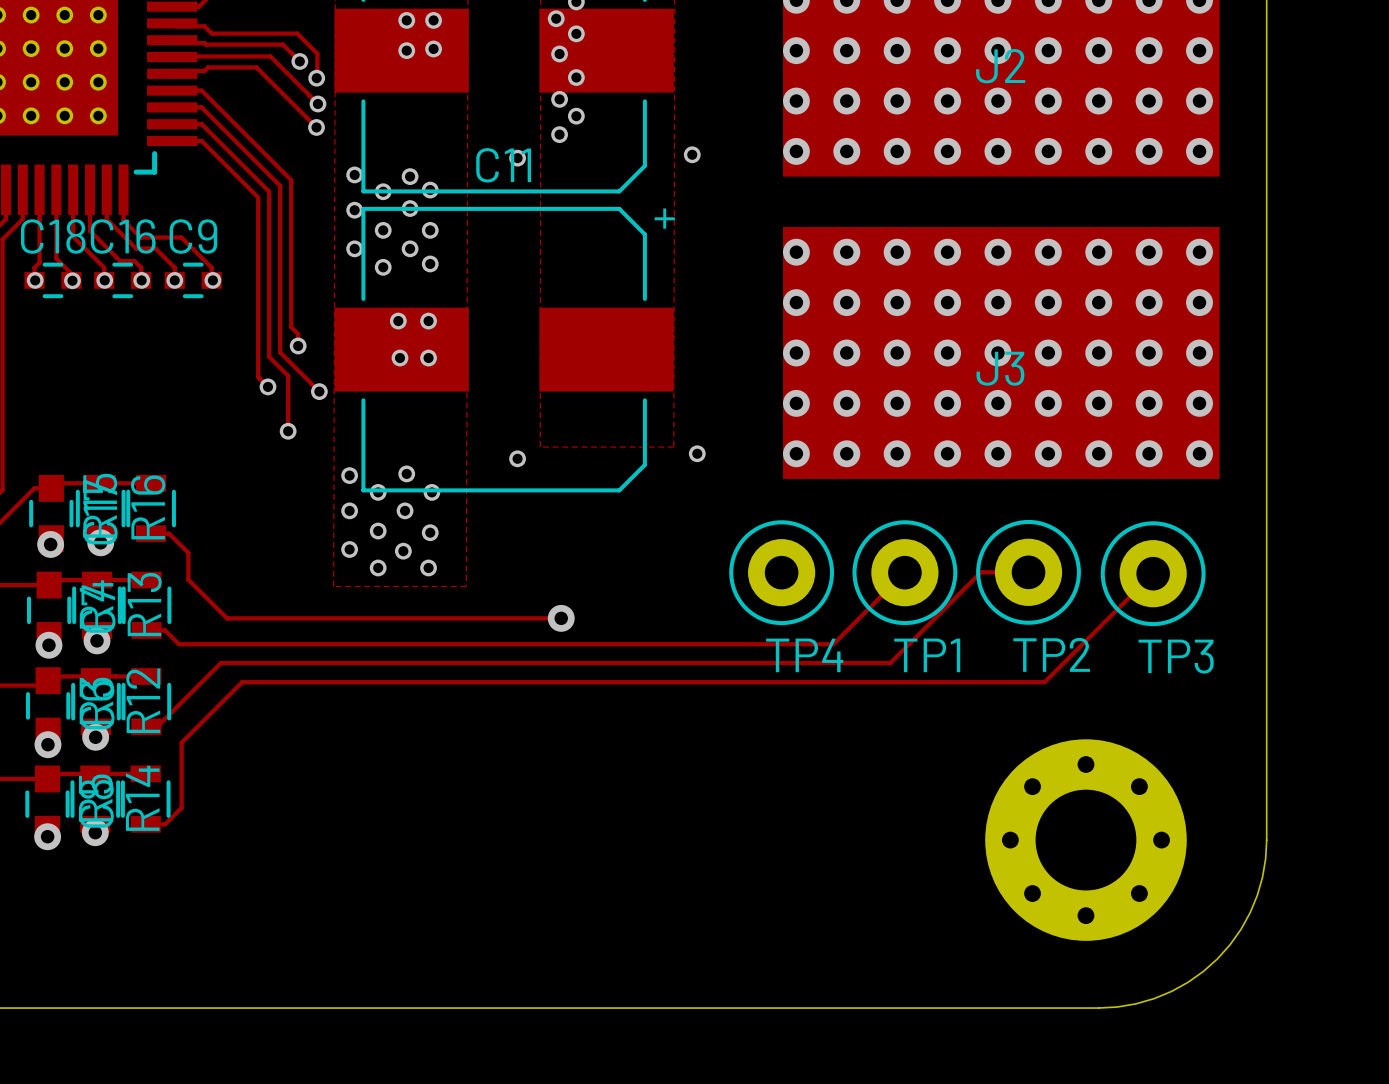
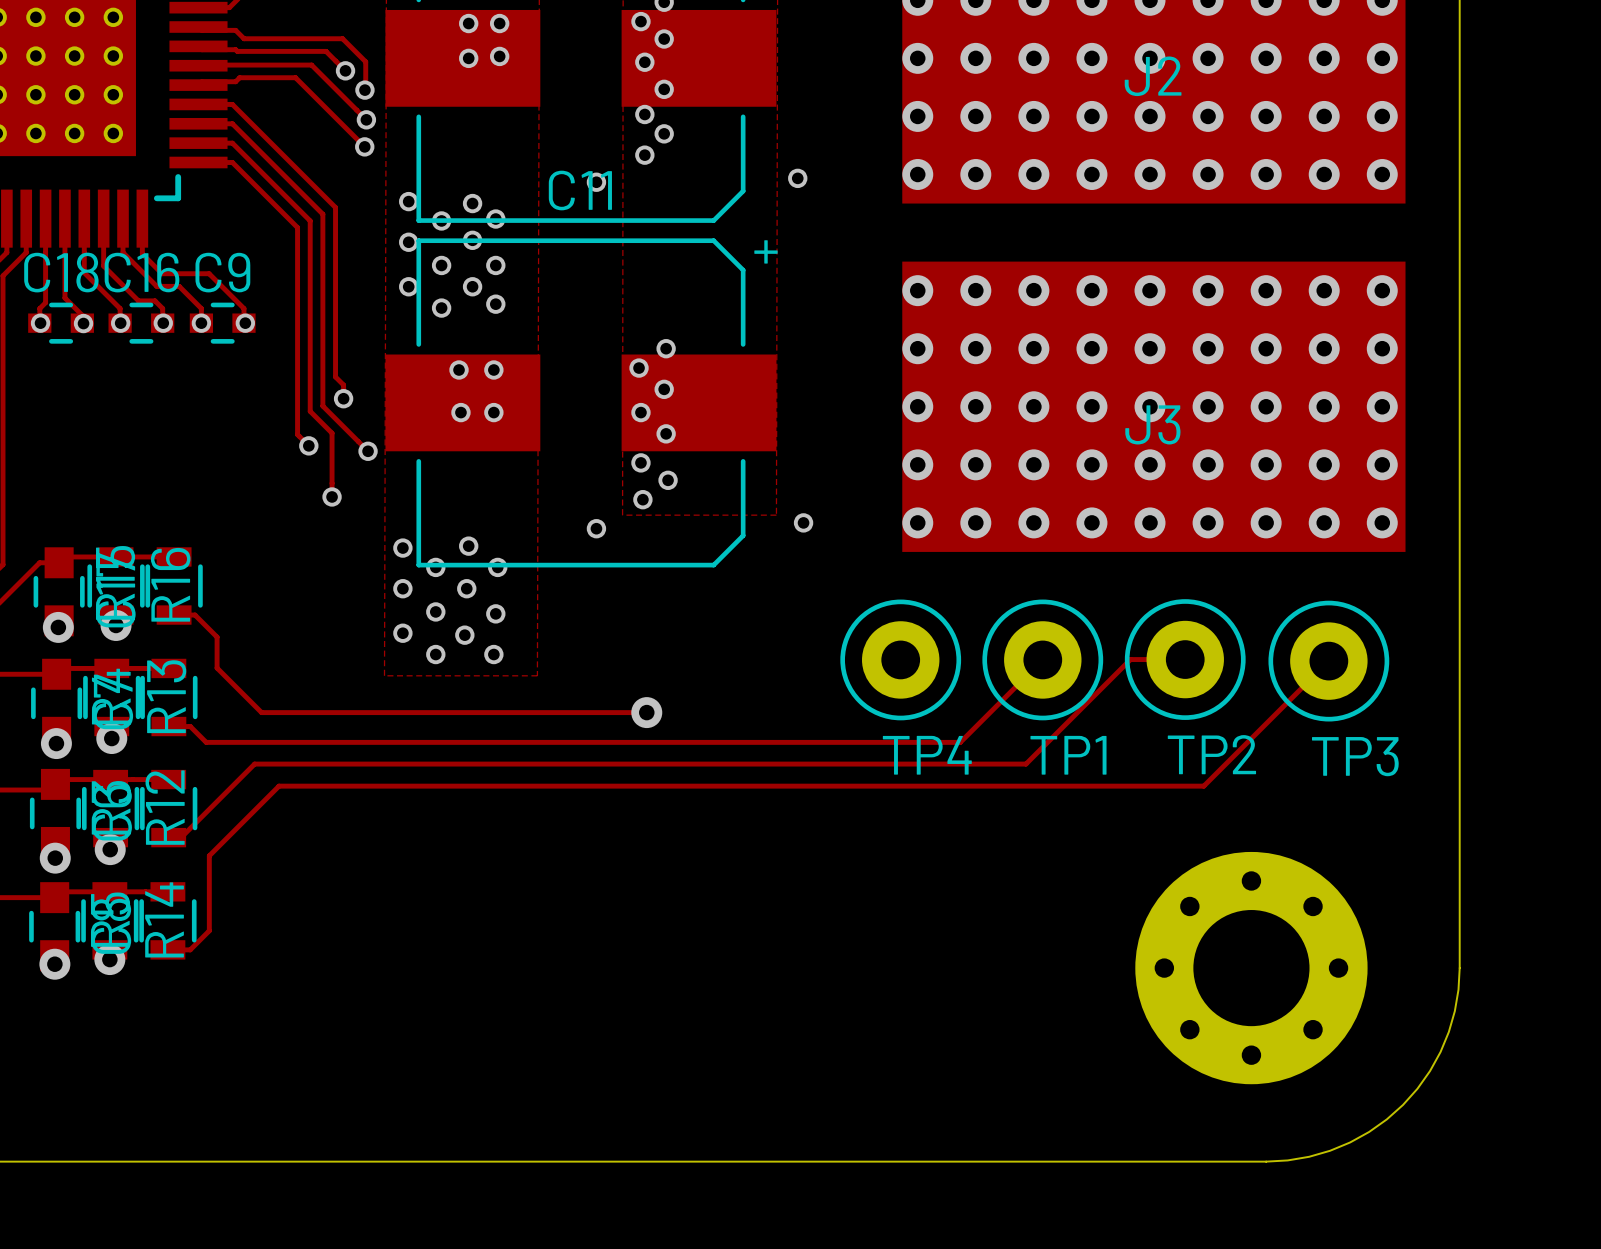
via: none -> (666, 348)
via: none -> (639, 368)
via: none -> (664, 389)
via: none -> (640, 412)
via: none -> (666, 433)
via: none -> (640, 462)
via: none -> (668, 480)
via: none -> (642, 499)

